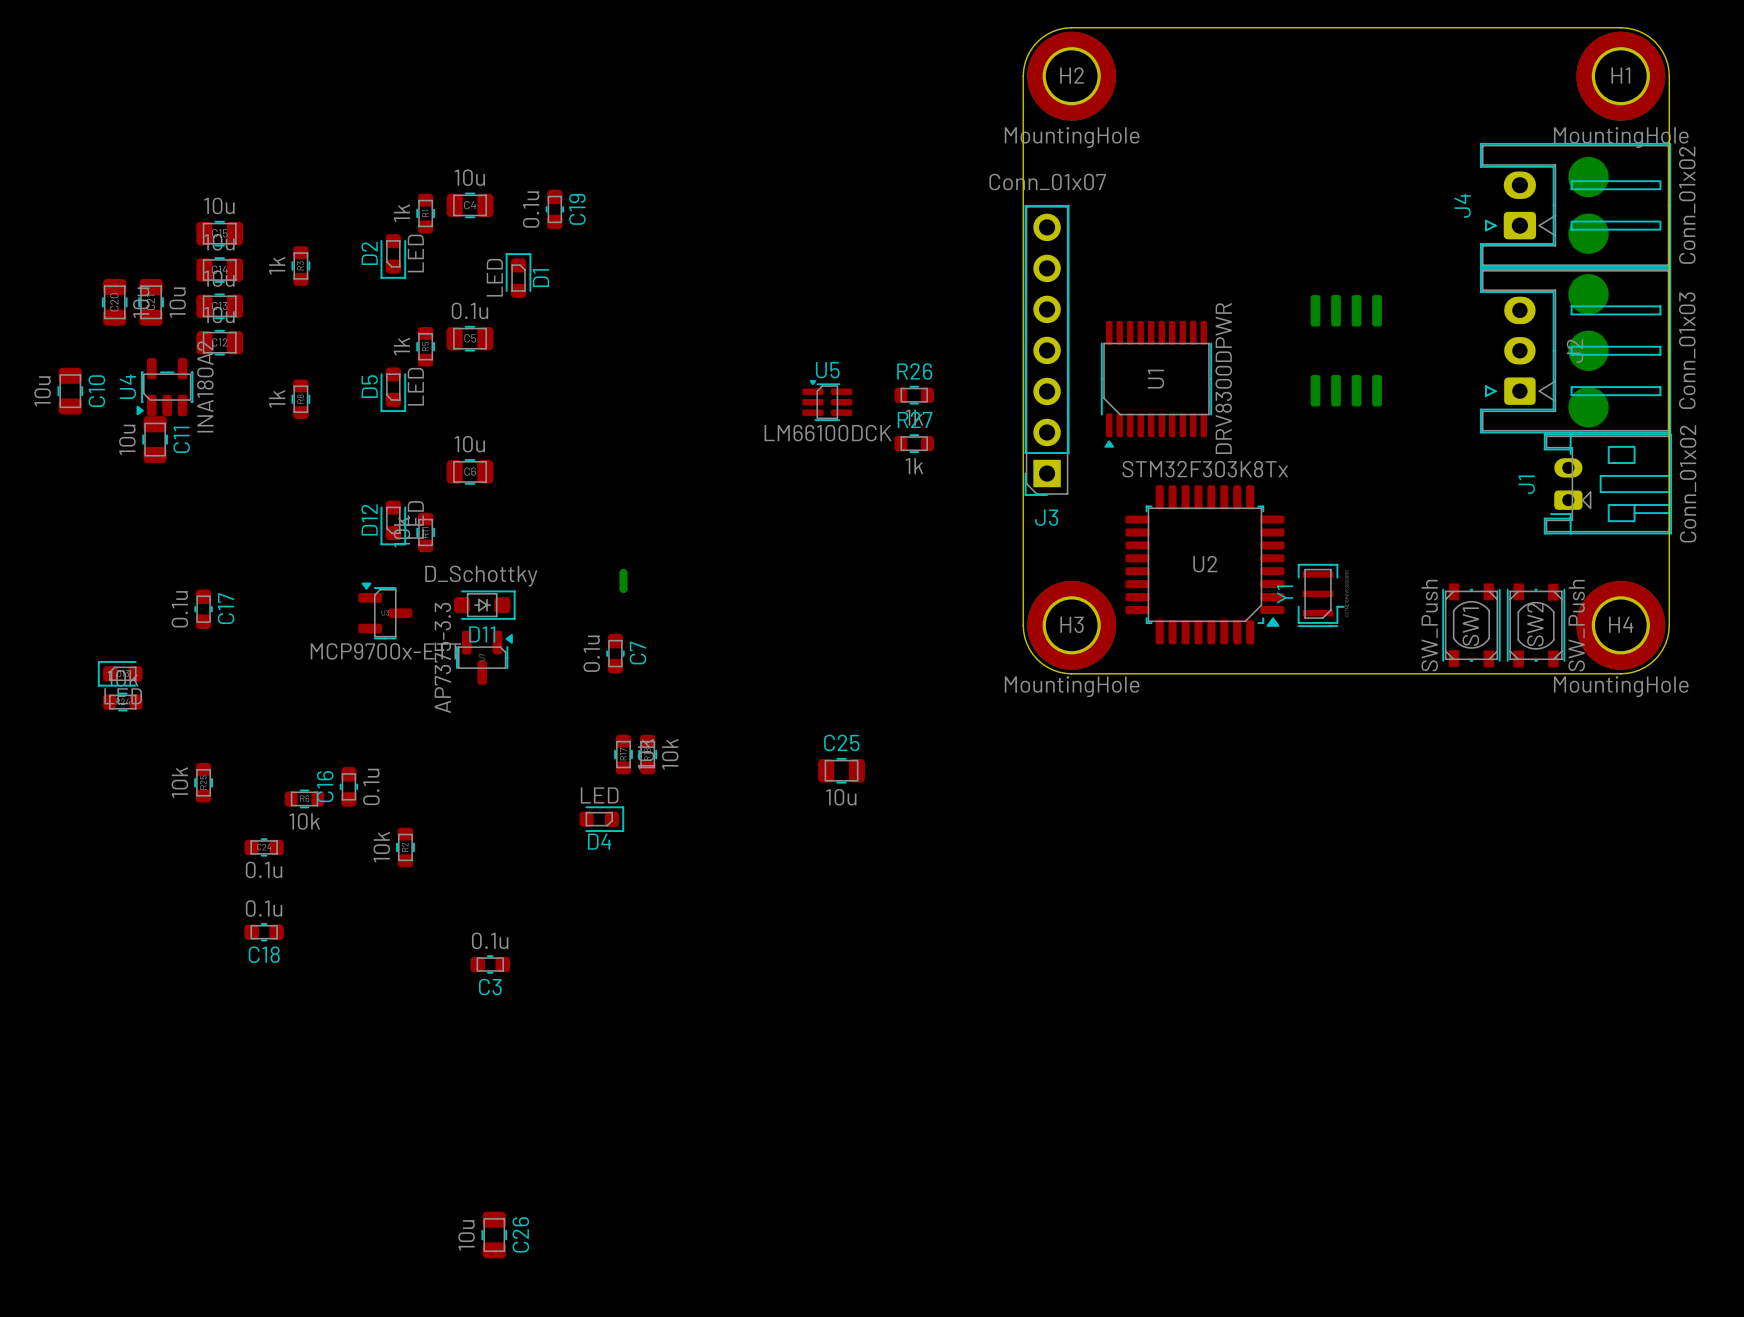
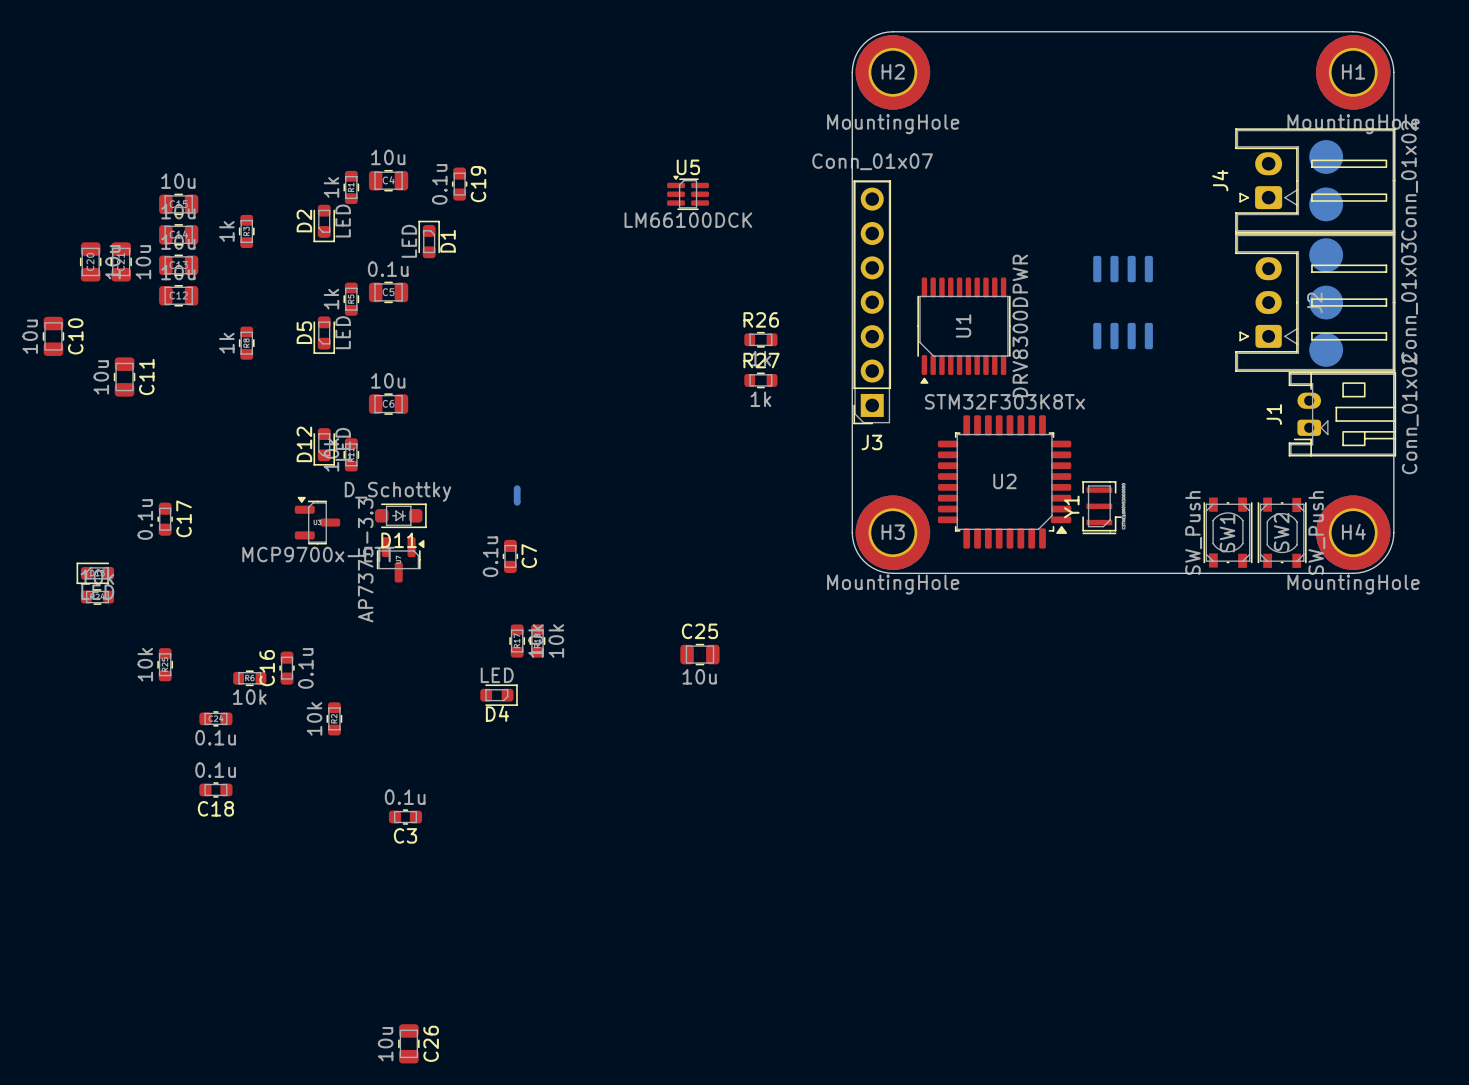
U4: INA180A2 (164, 387) -> none
U5 position: (827, 400) -> (688, 192)

